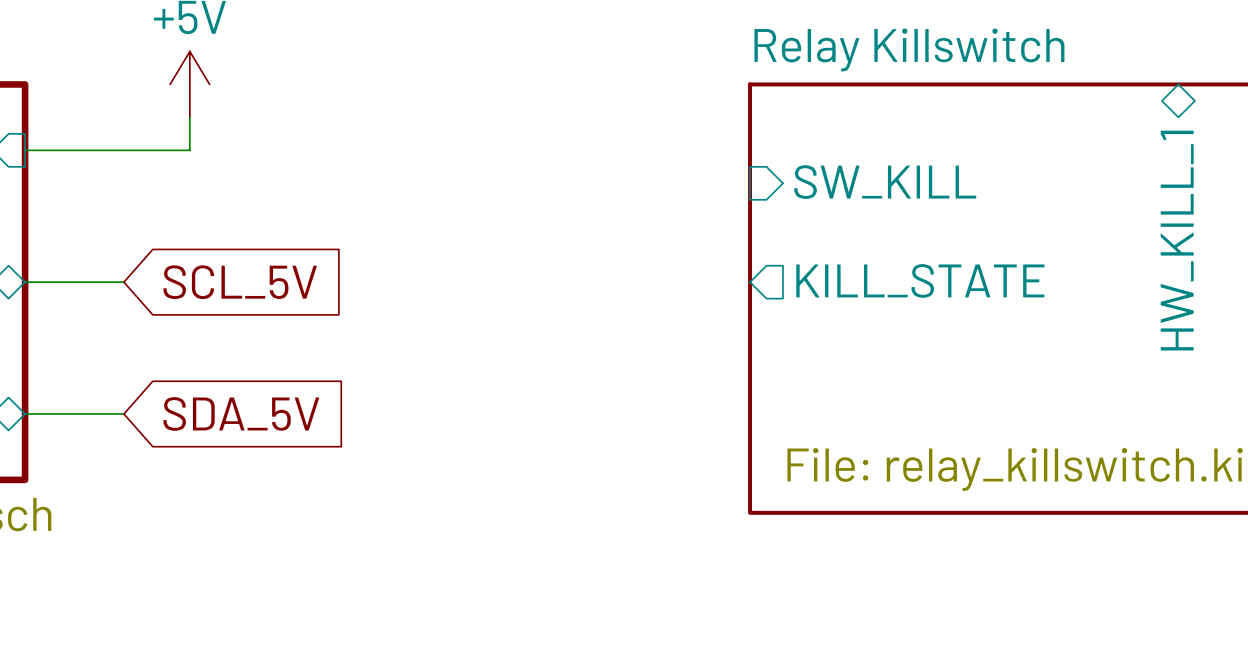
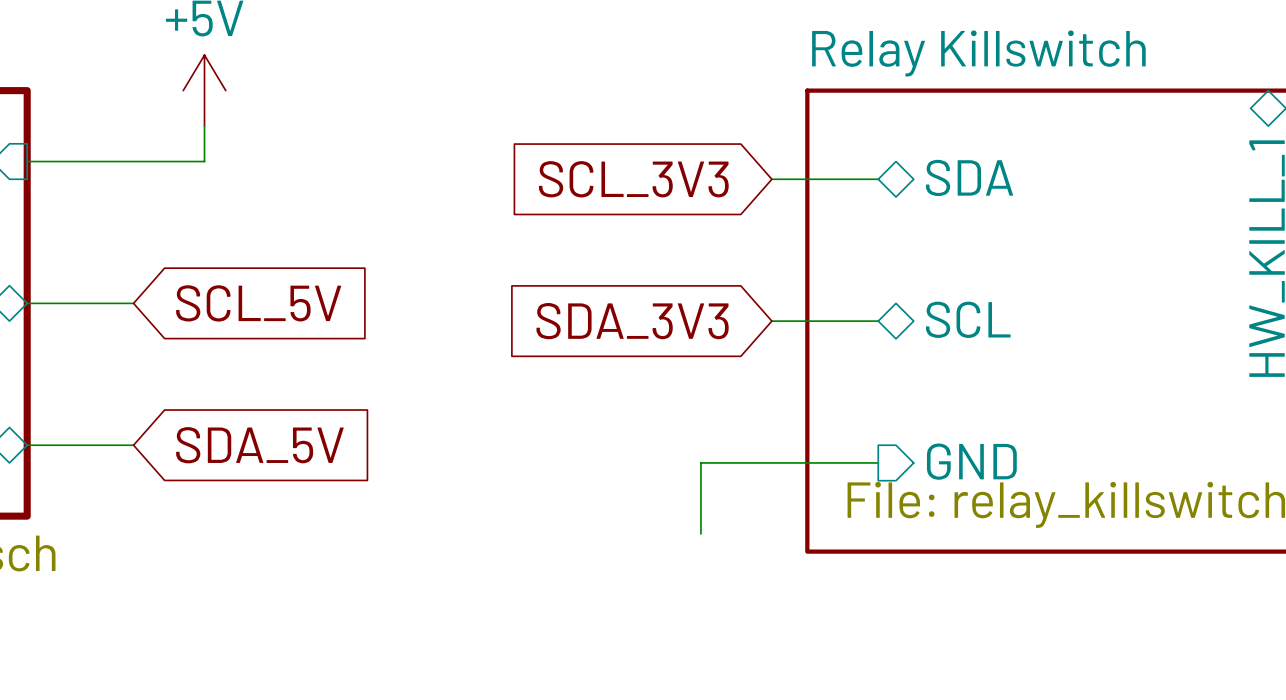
sheet pin: none -> SDA (969, 177)
global label: none -> SCL_3V3 (633, 179)
wire: none -> (771, 179) (878, 179)
sheet pin: SW_KILL (885, 182) -> none
sheet pin: KILL_STATE (920, 280) -> none
sheet pin: none -> SCL (968, 319)
global label: none -> SDA_3V3 (632, 321)
wire: none -> (771, 321) (878, 321)
sheet pin: none -> GND (971, 461)
wire: none -> (878, 462) (700, 462) (700, 533)

